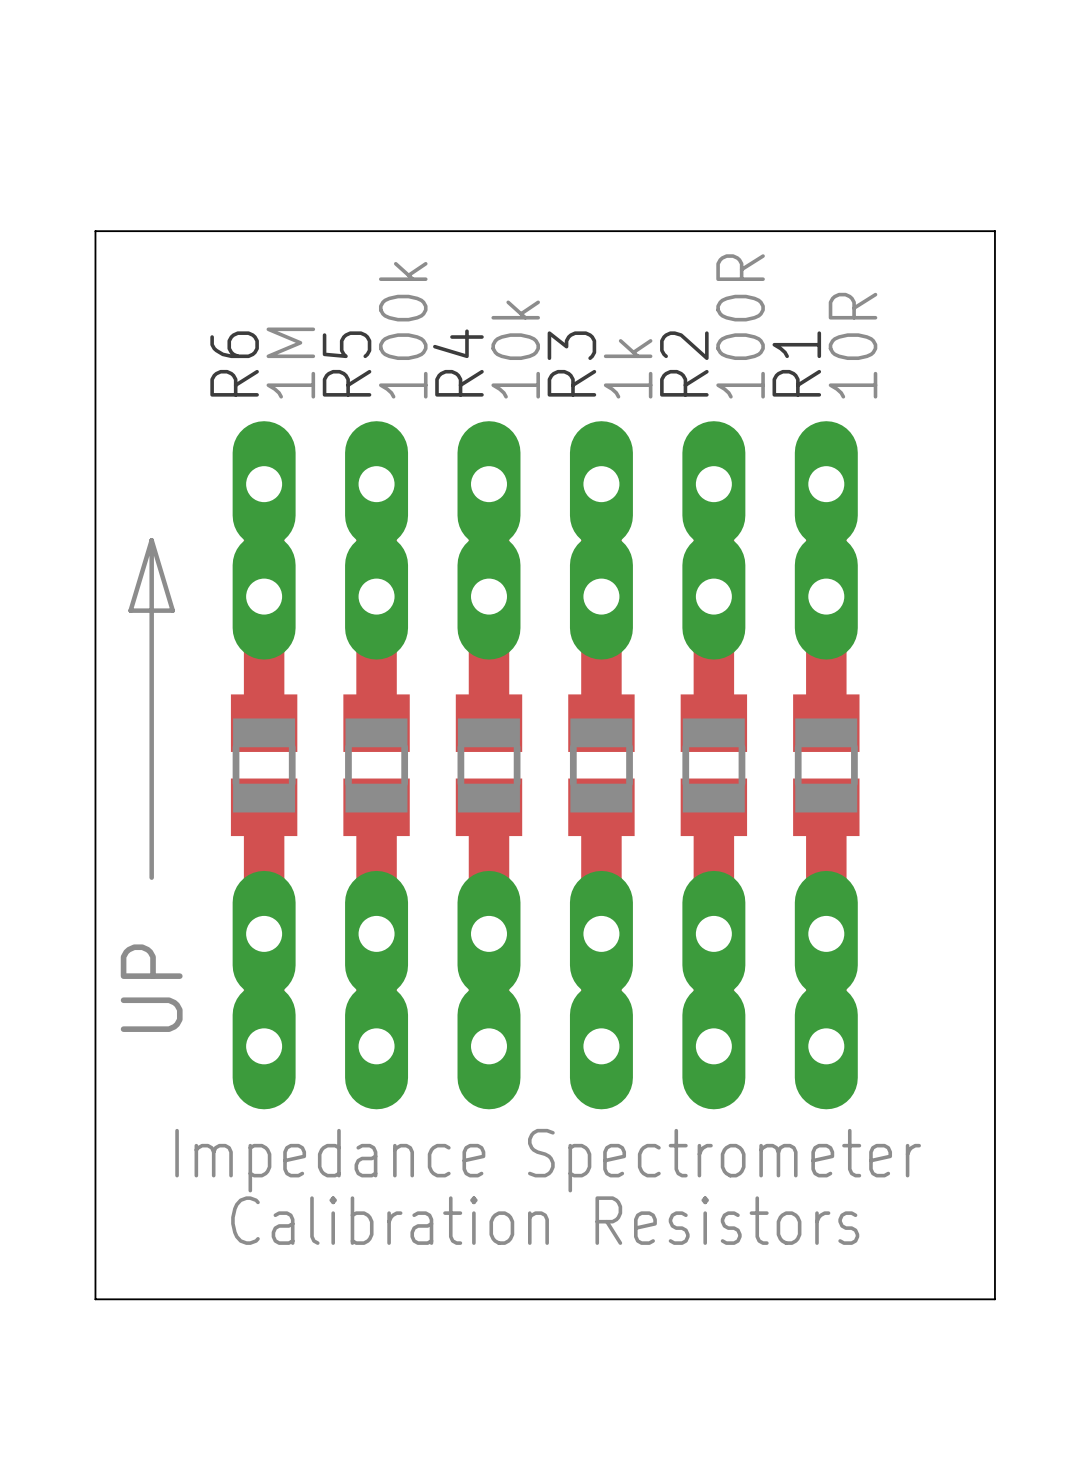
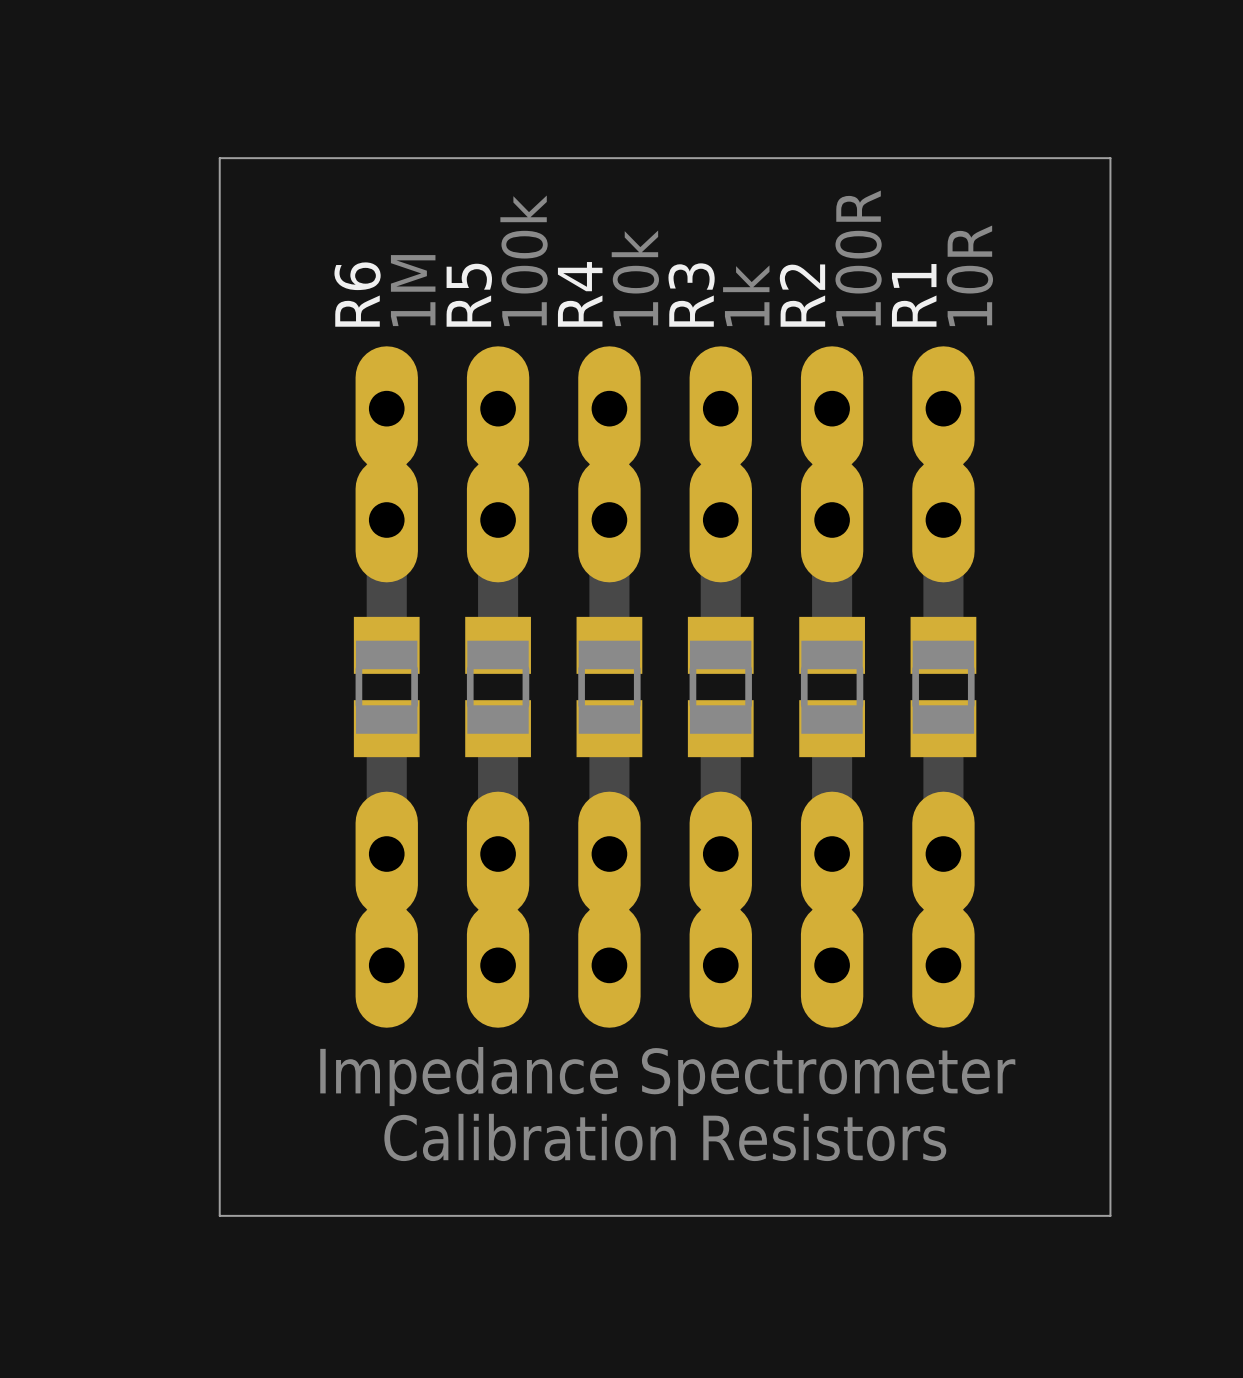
line: (151, 540) (151, 877) -> none
line: (151, 540) (130, 610) (172, 610) (151, 540) -> none
text: UP (151, 988) -> none

